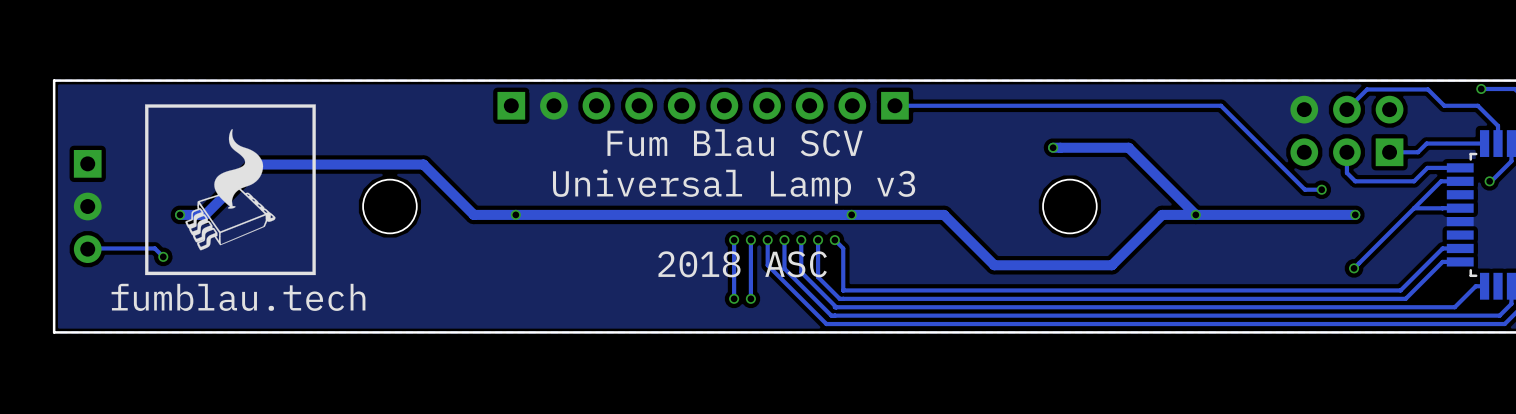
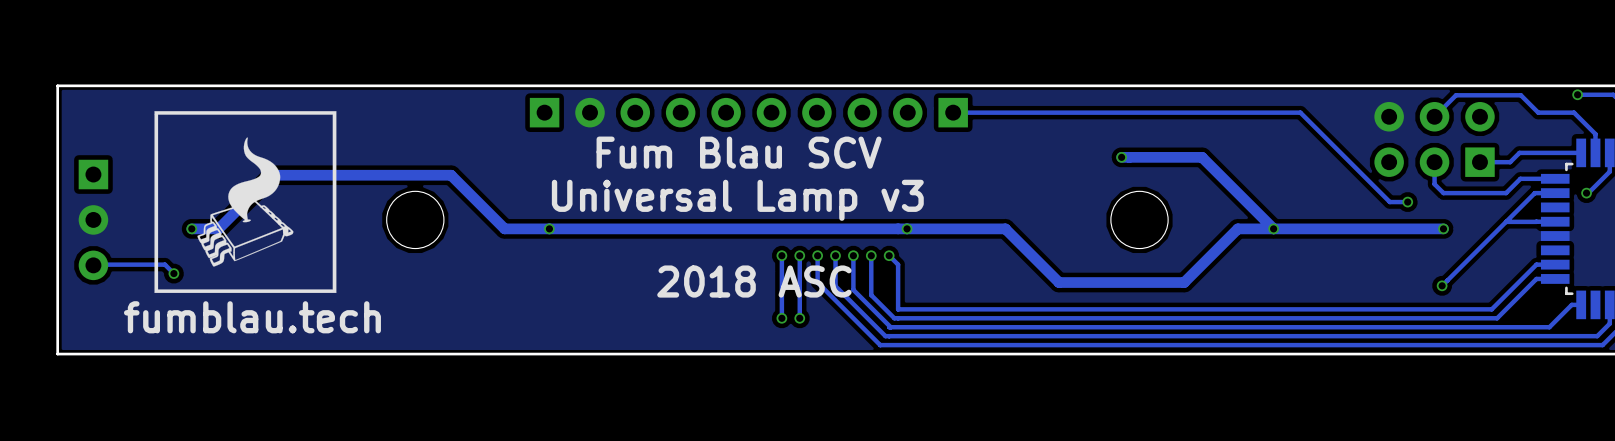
text position: Fum Blau SCV (735, 142) -> Fum Blau SCV (739, 152)
text position: Universal Lamp v3 (734, 186) -> Universal Lamp v3 (737, 200)
text position: 2018 ASC (742, 264) -> 2018 ASC (754, 281)

